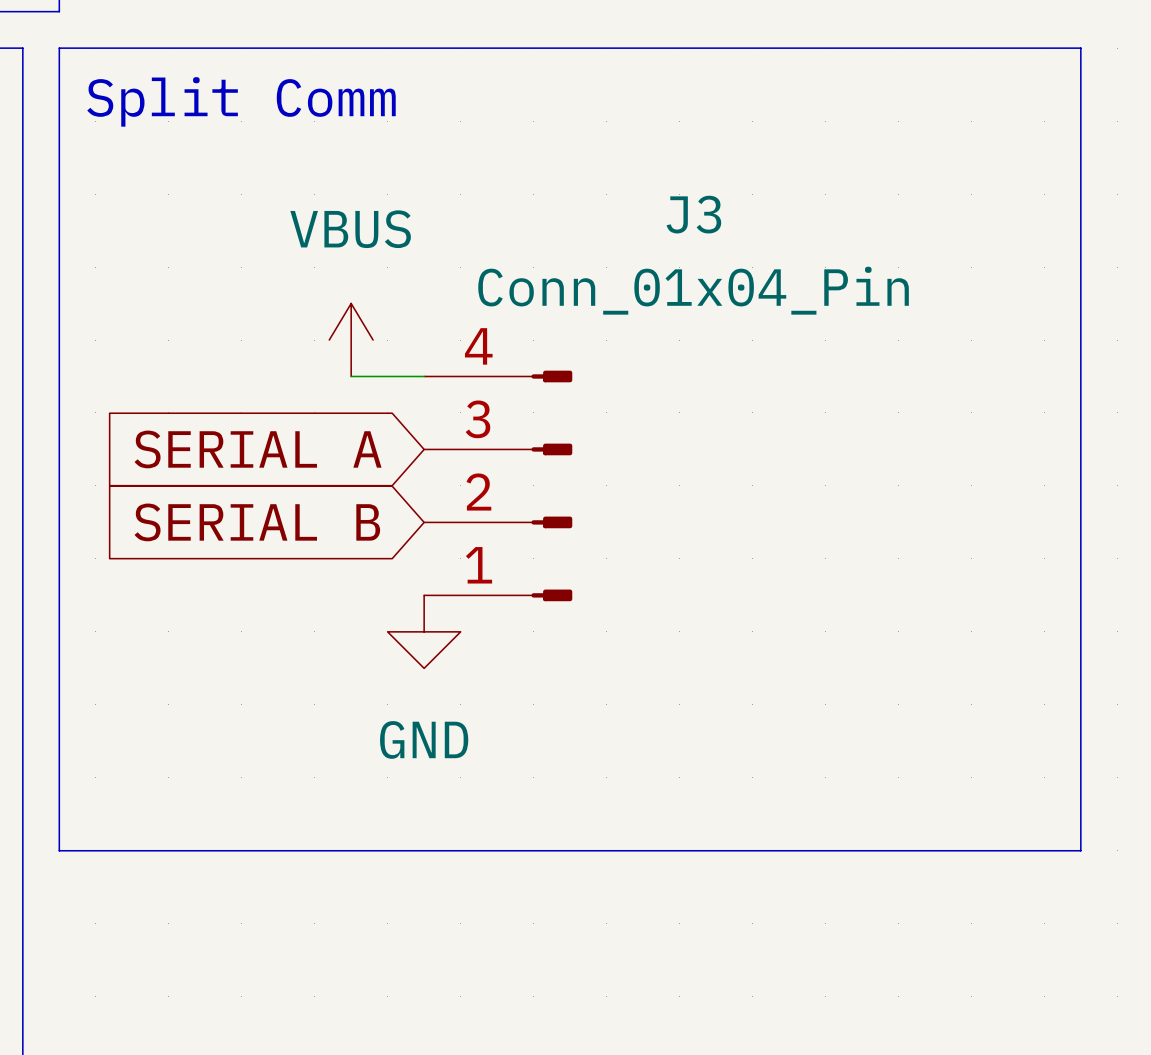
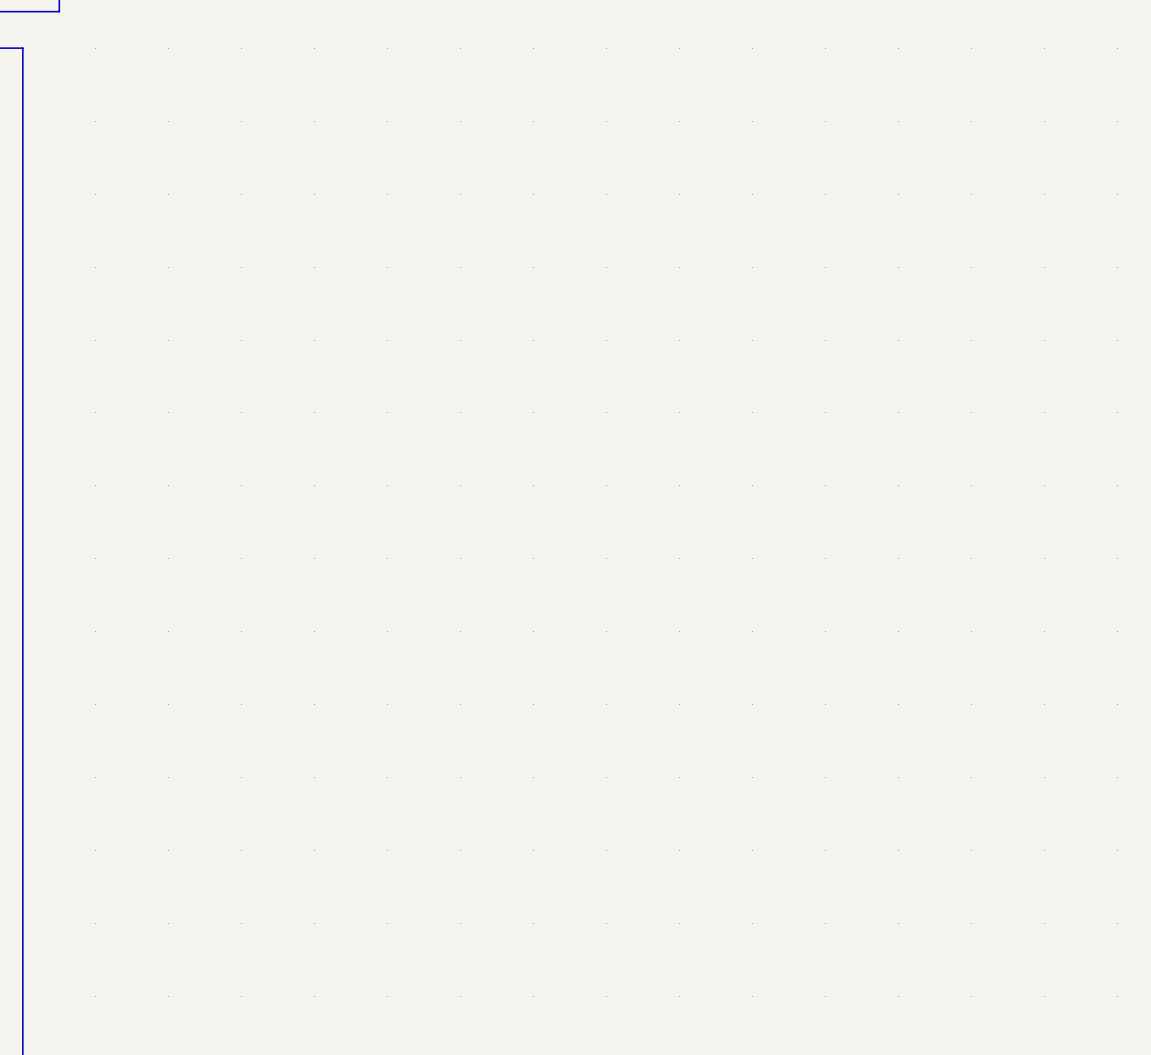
line: (59, 48) (59, 850) (1080, 850) (1080, 48) (59, 48) -> none
text: Split Comm (241, 101) -> none
power symbol: VBUS (351, 340) -> none
wire: (351, 376) (424, 376) -> none
global label: SERIAL A (258, 449) -> none
J3: Conn_01x04_Pin (498, 485) -> none
global label: SERIAL B (257, 522) -> none
power symbol: GND (424, 631) -> none

